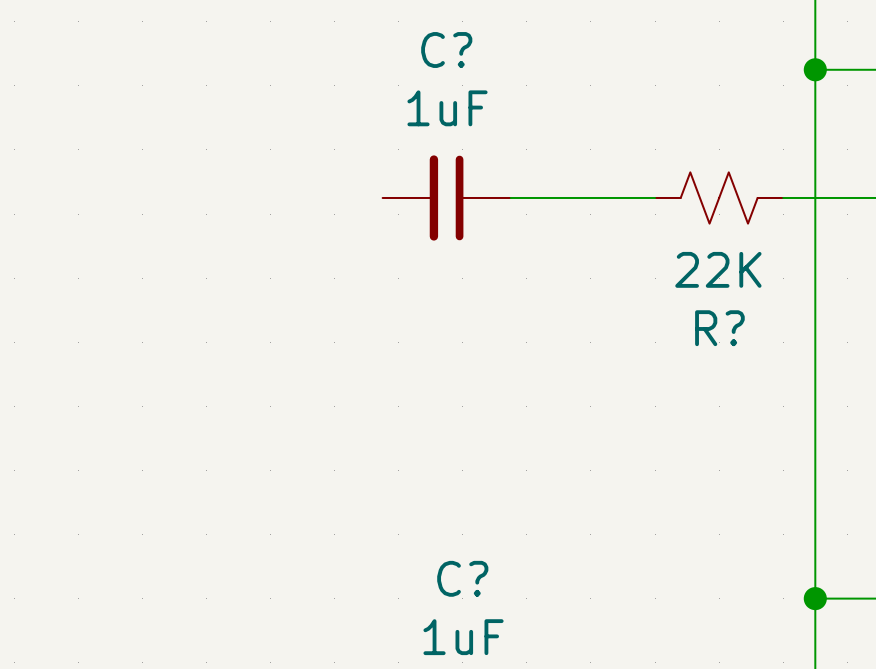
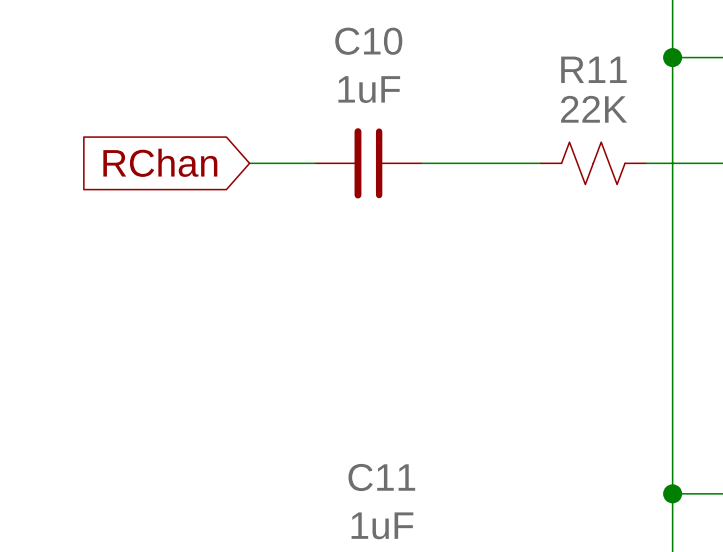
C? name: C? (446, 50) -> C10 (368, 41)
global label: none -> RChan (160, 162)
wire: none -> (249, 163) (315, 163)
R? value position: 22K (718, 269) -> 22K (594, 109)
R? name: R? (719, 328) -> R11 (593, 69)
C? name: C? (462, 578) -> C11 (381, 477)

